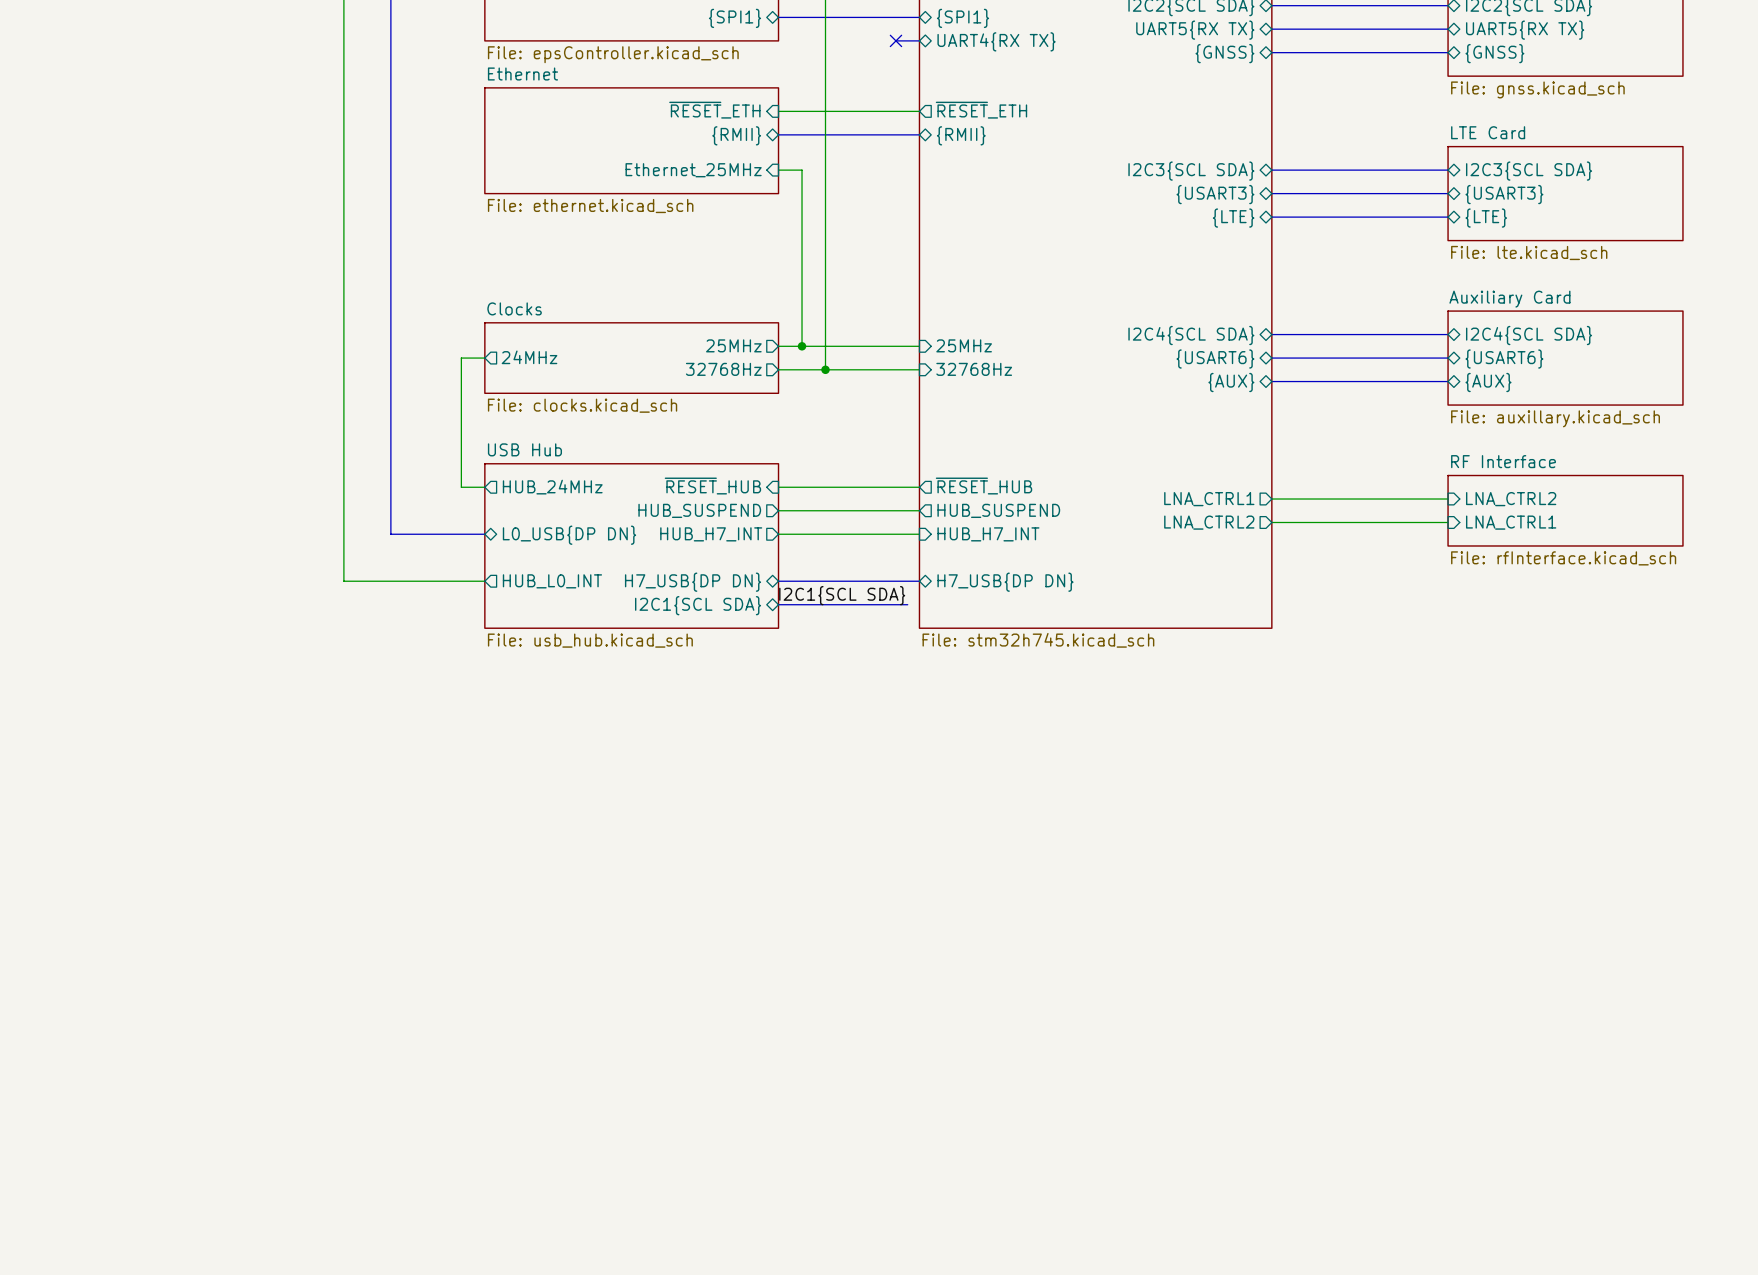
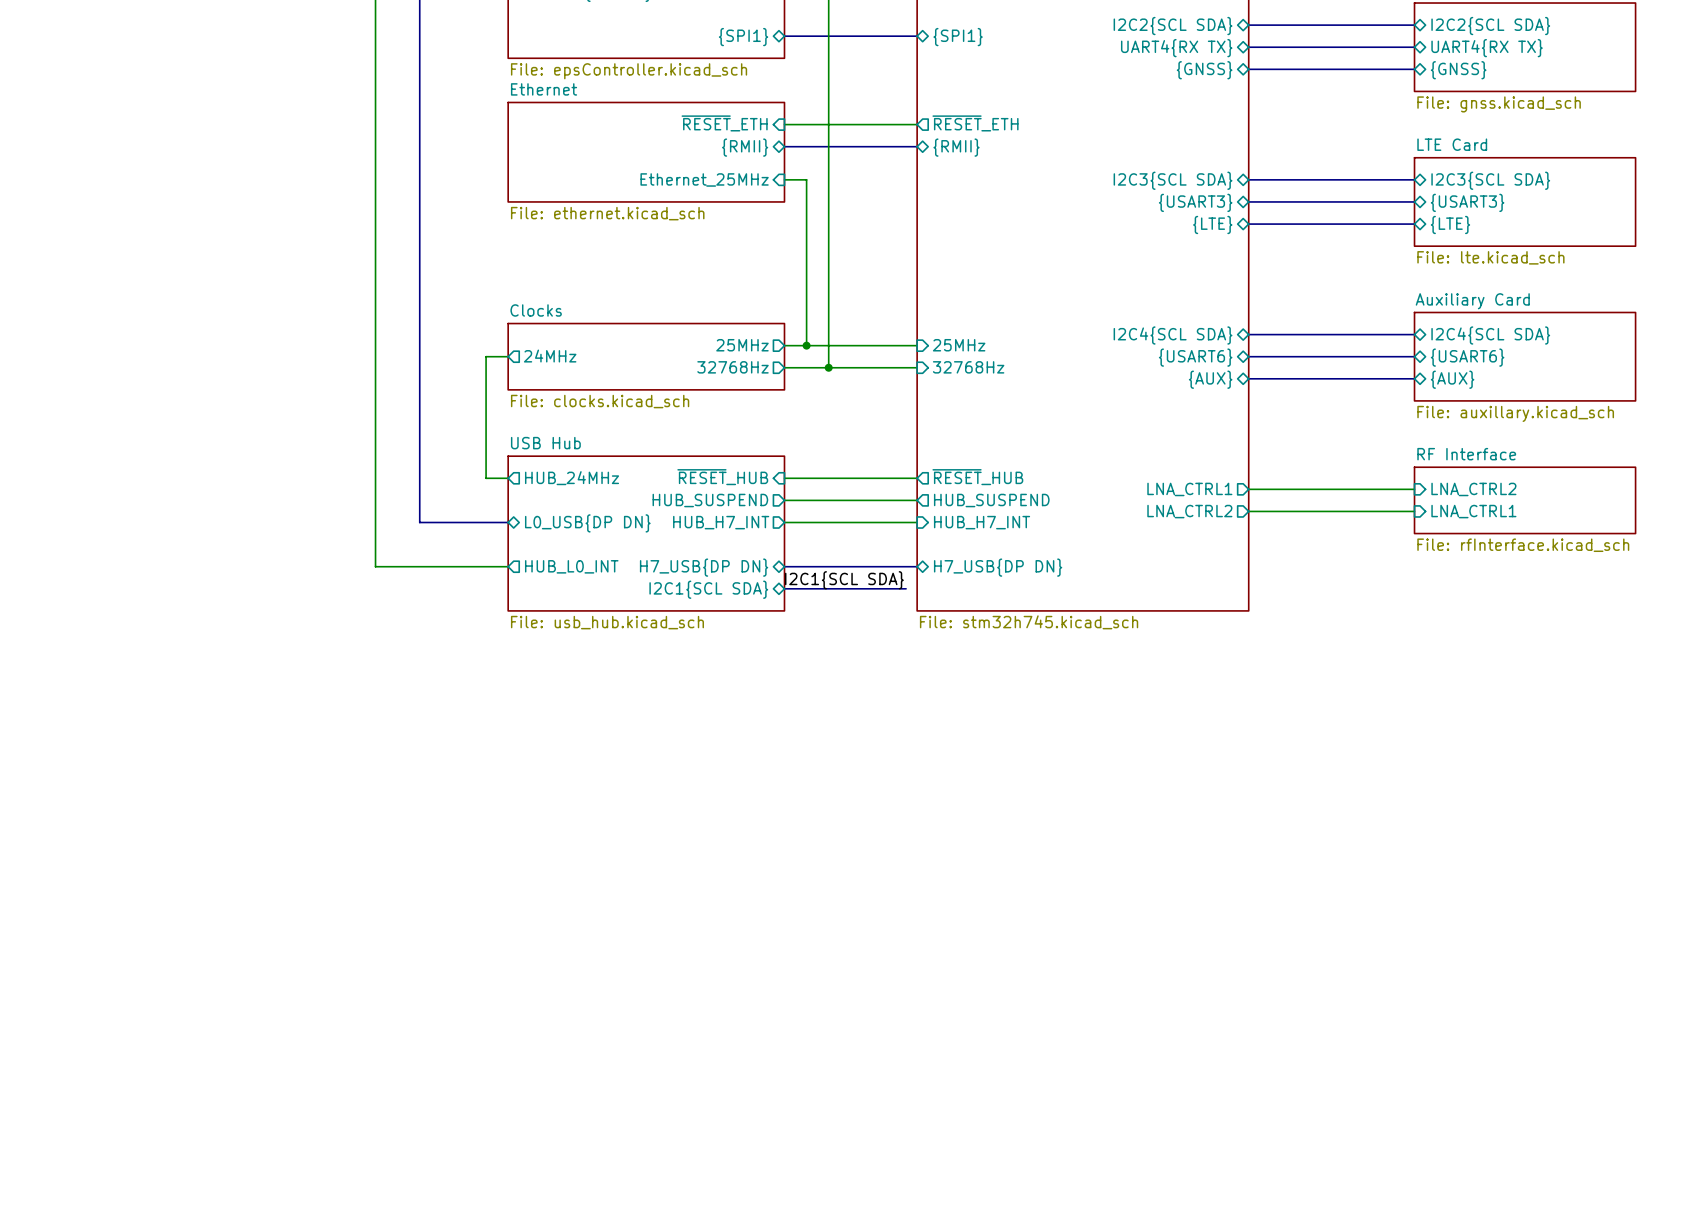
sheet pin: UART5{RX TX} (1195, 30) -> UART4{RX TX} (1176, 48)
sheet pin: UART5{RX TX} (1525, 30) -> UART4{RX TX} (1487, 48)
bus: (895, 40) (919, 40) -> none
no-connect mark: (895, 40) -> none
sheet pin: UART4{RX TX} (996, 41) -> none

